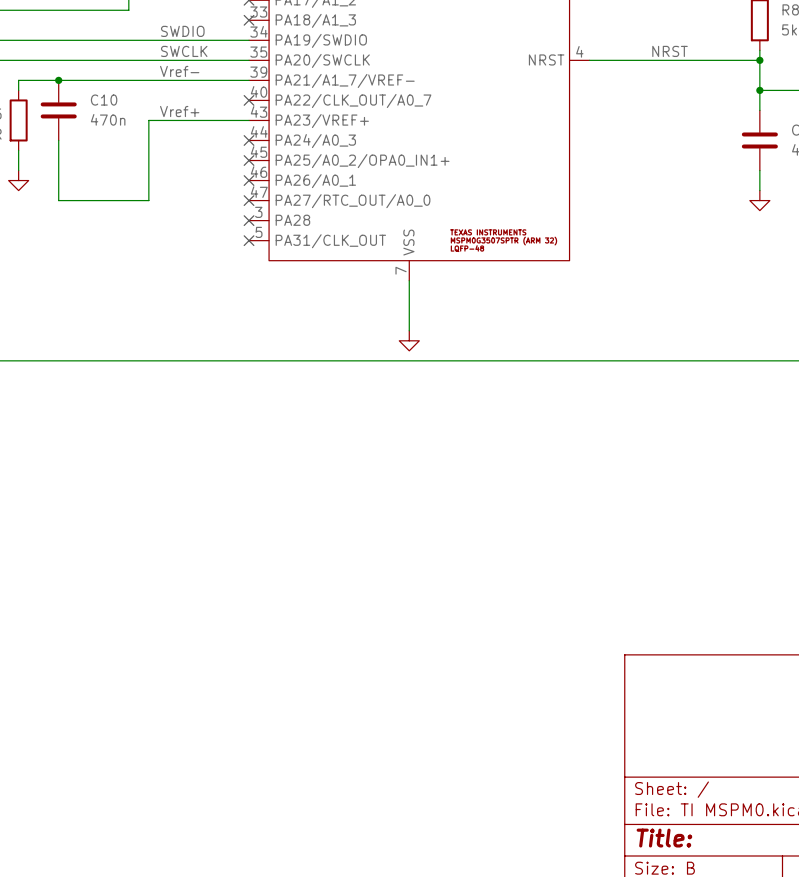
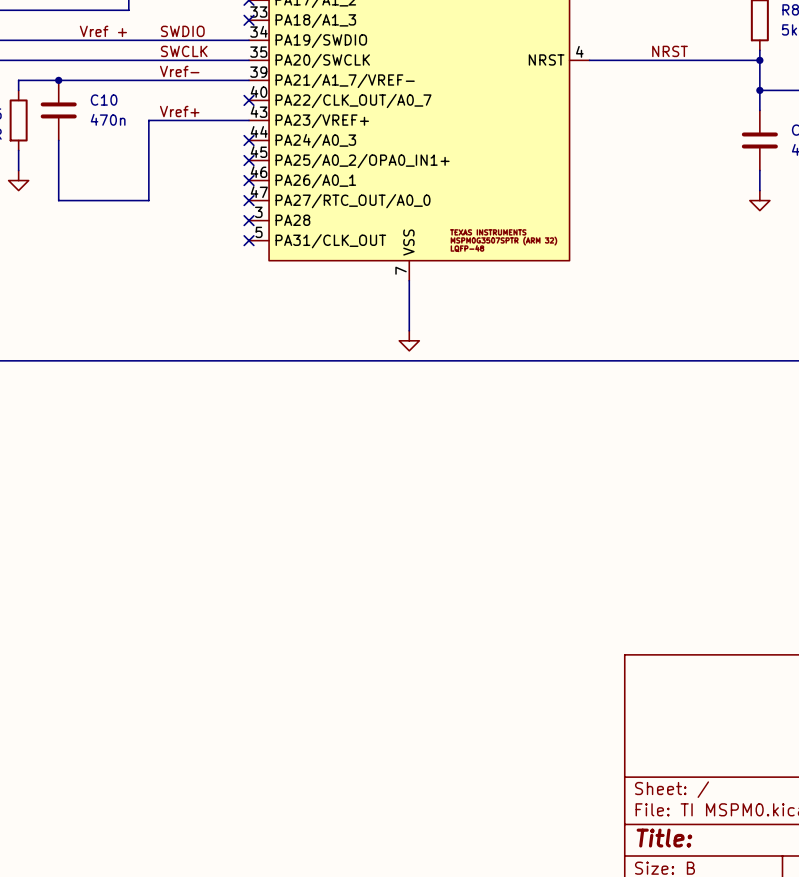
label: none -> Vref + (103, 31)

